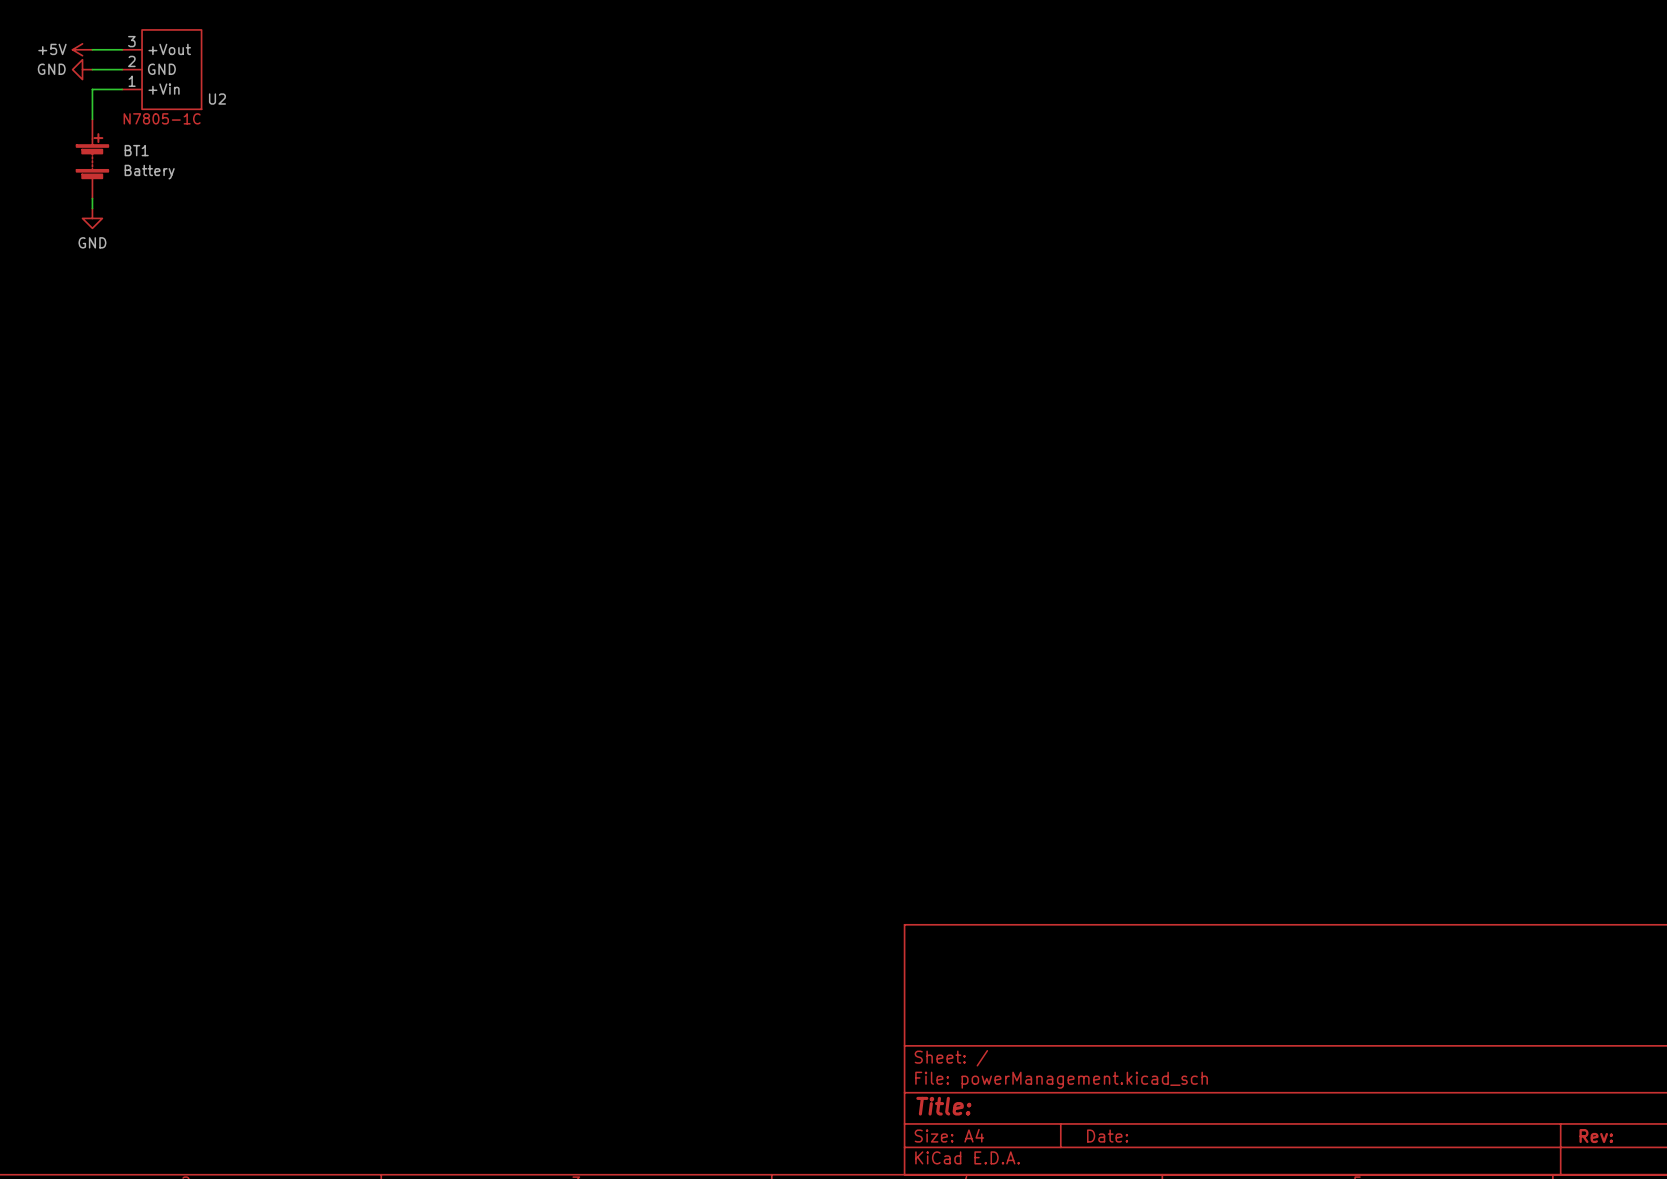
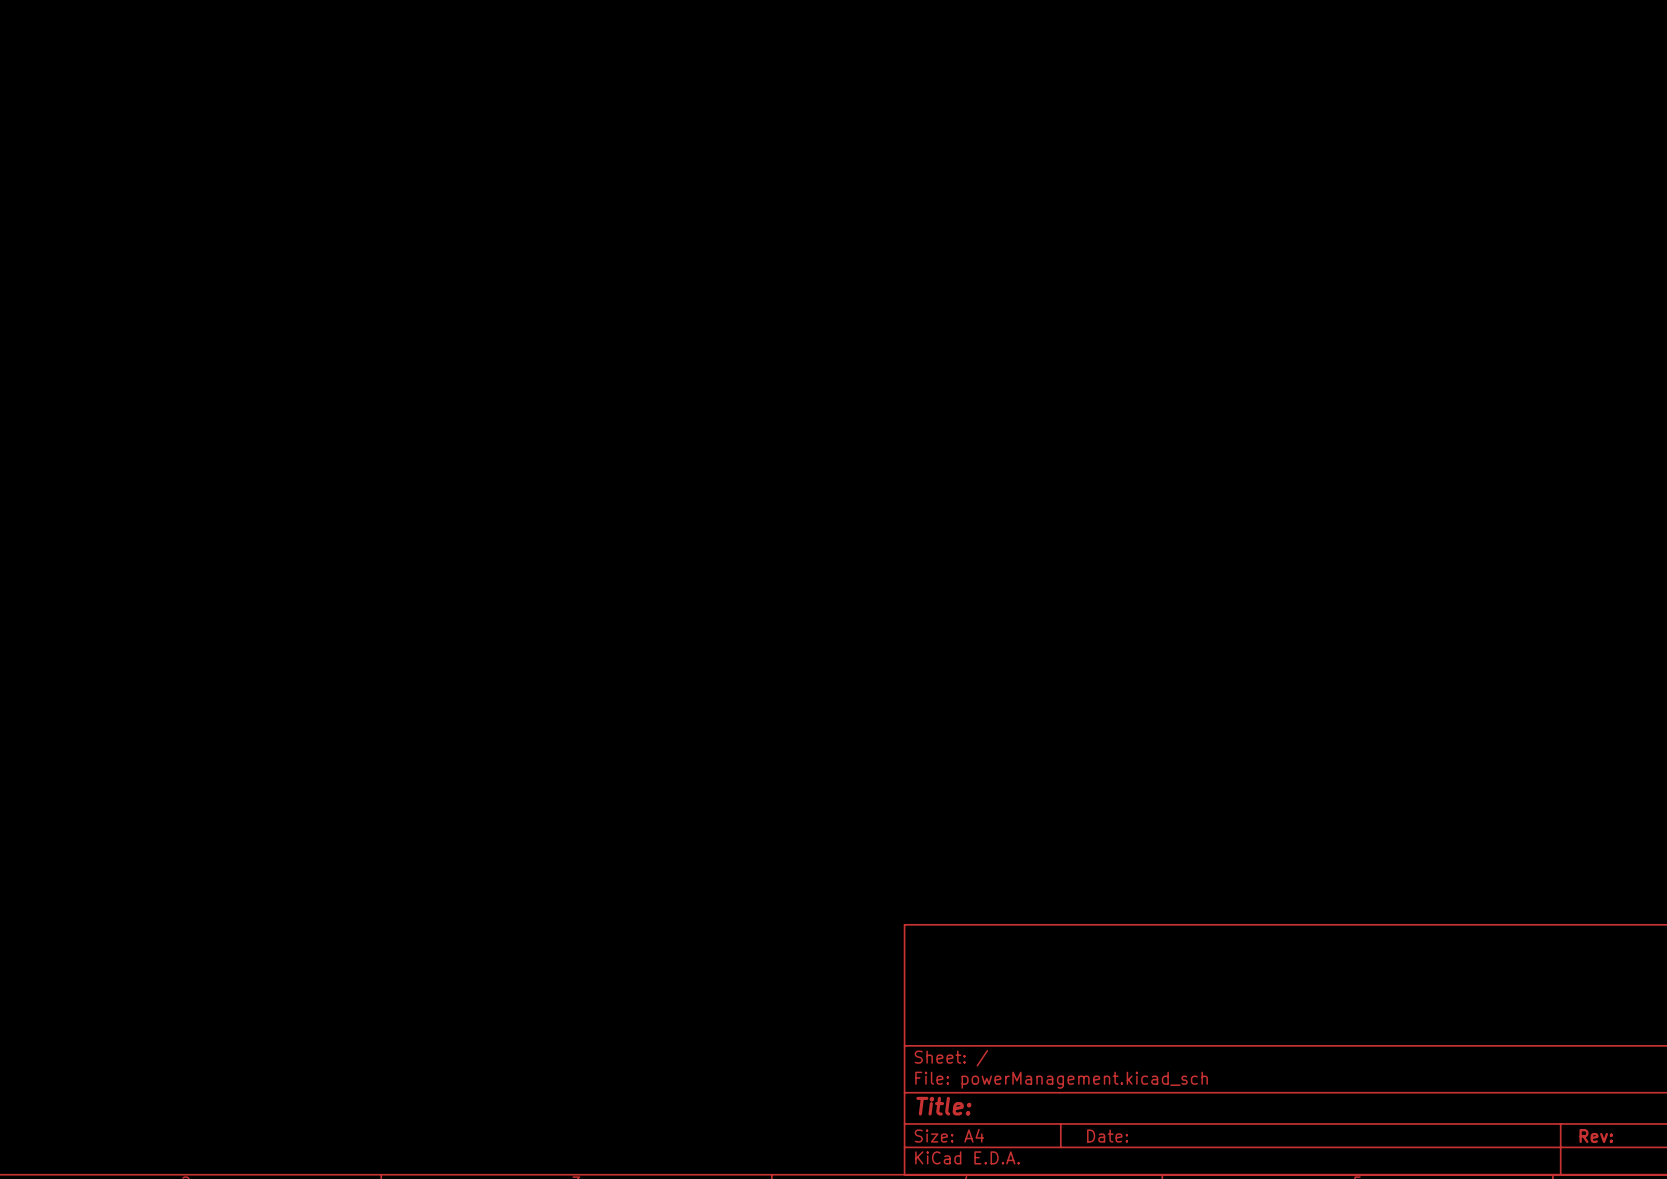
power symbol: +5V (82, 49) -> none
wire: (92, 49) (122, 49) -> none
power symbol: GND (82, 69) -> none
wire: (92, 69) (122, 69) -> none
U2: (161, 69) -> none
wire: (122, 89) (92, 89) (92, 119) -> none
BT1: Battery (92, 158) -> none
wire: (92, 198) (92, 208) -> none
power symbol: GND (92, 218) -> none

